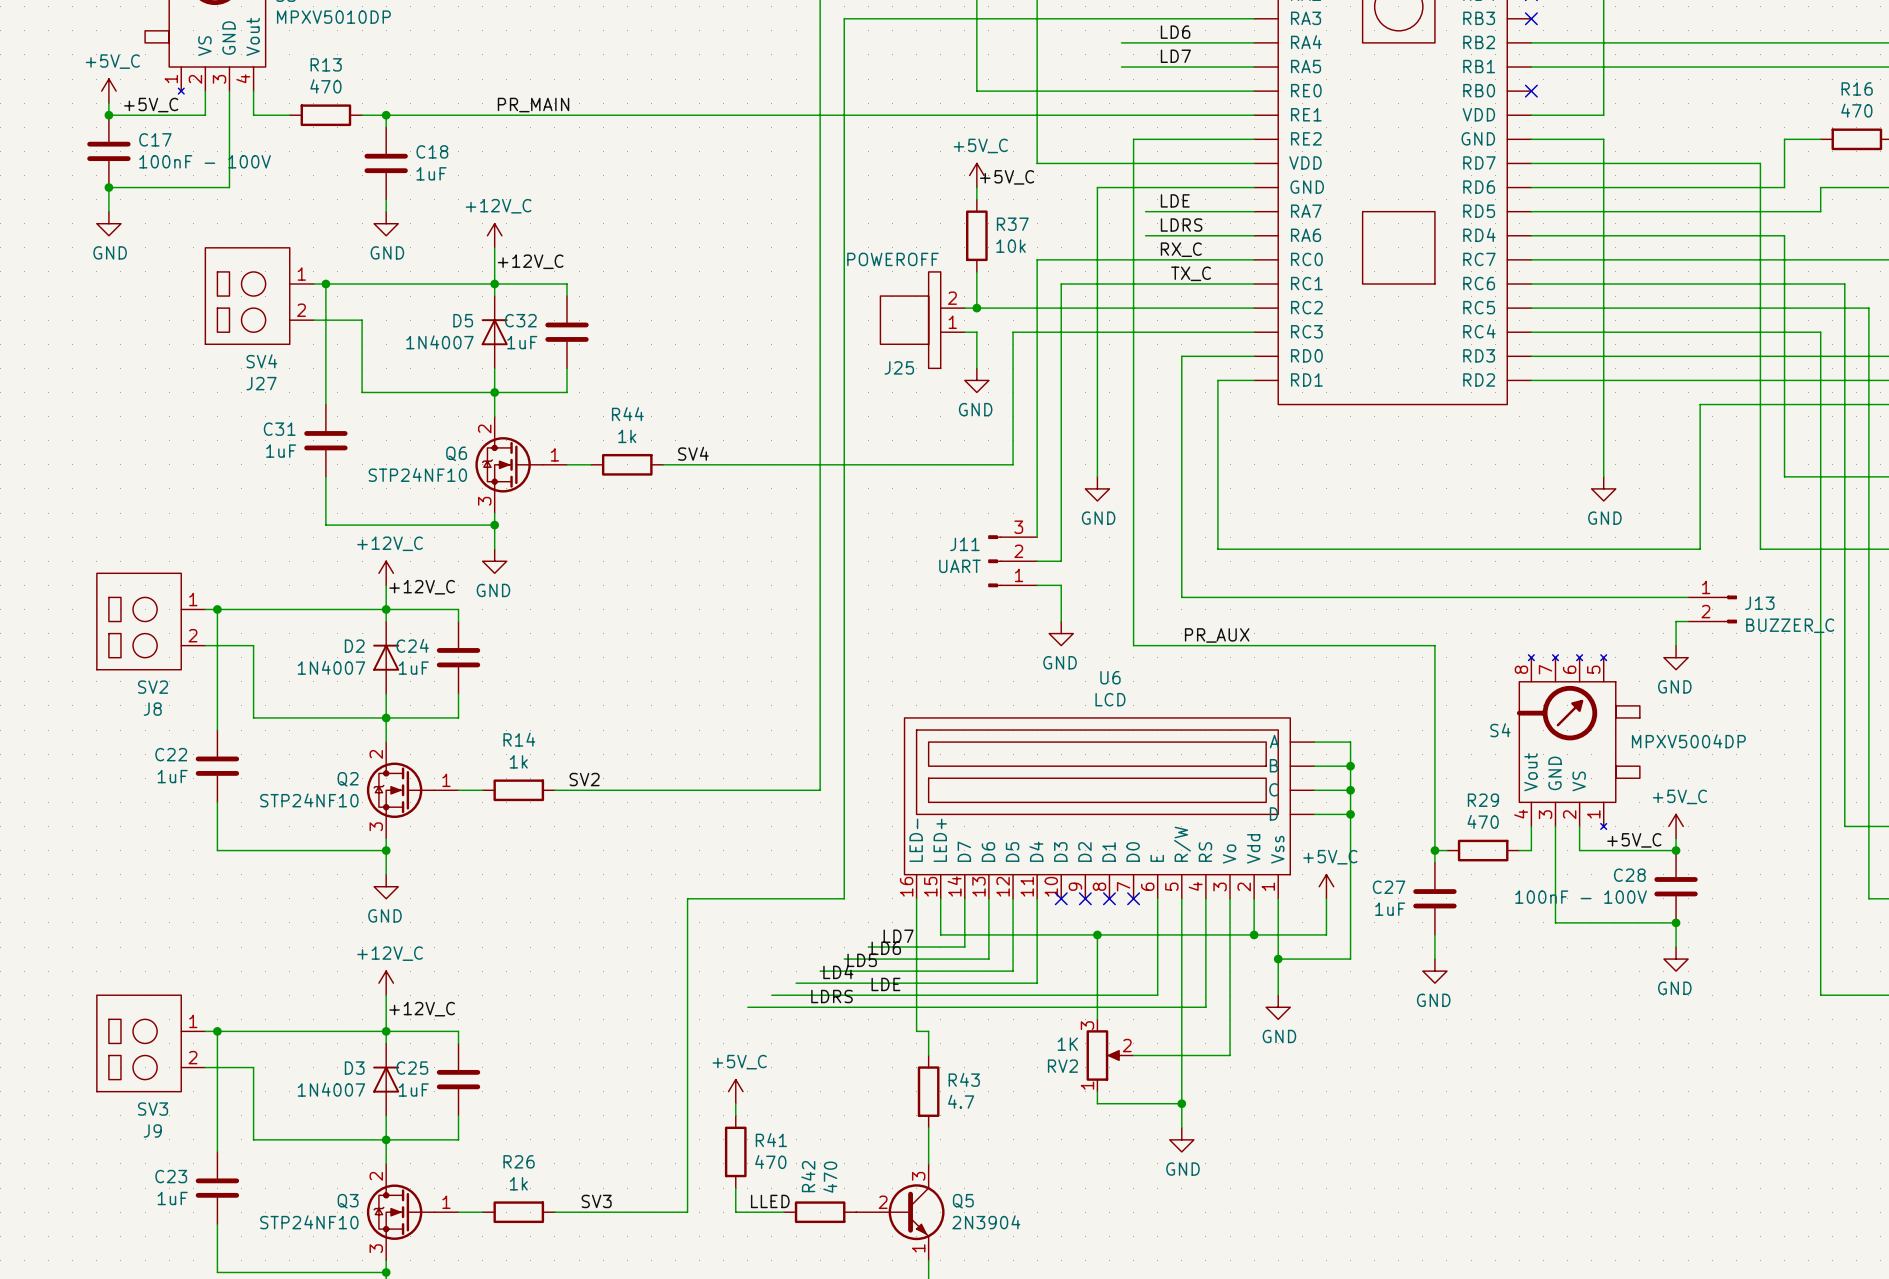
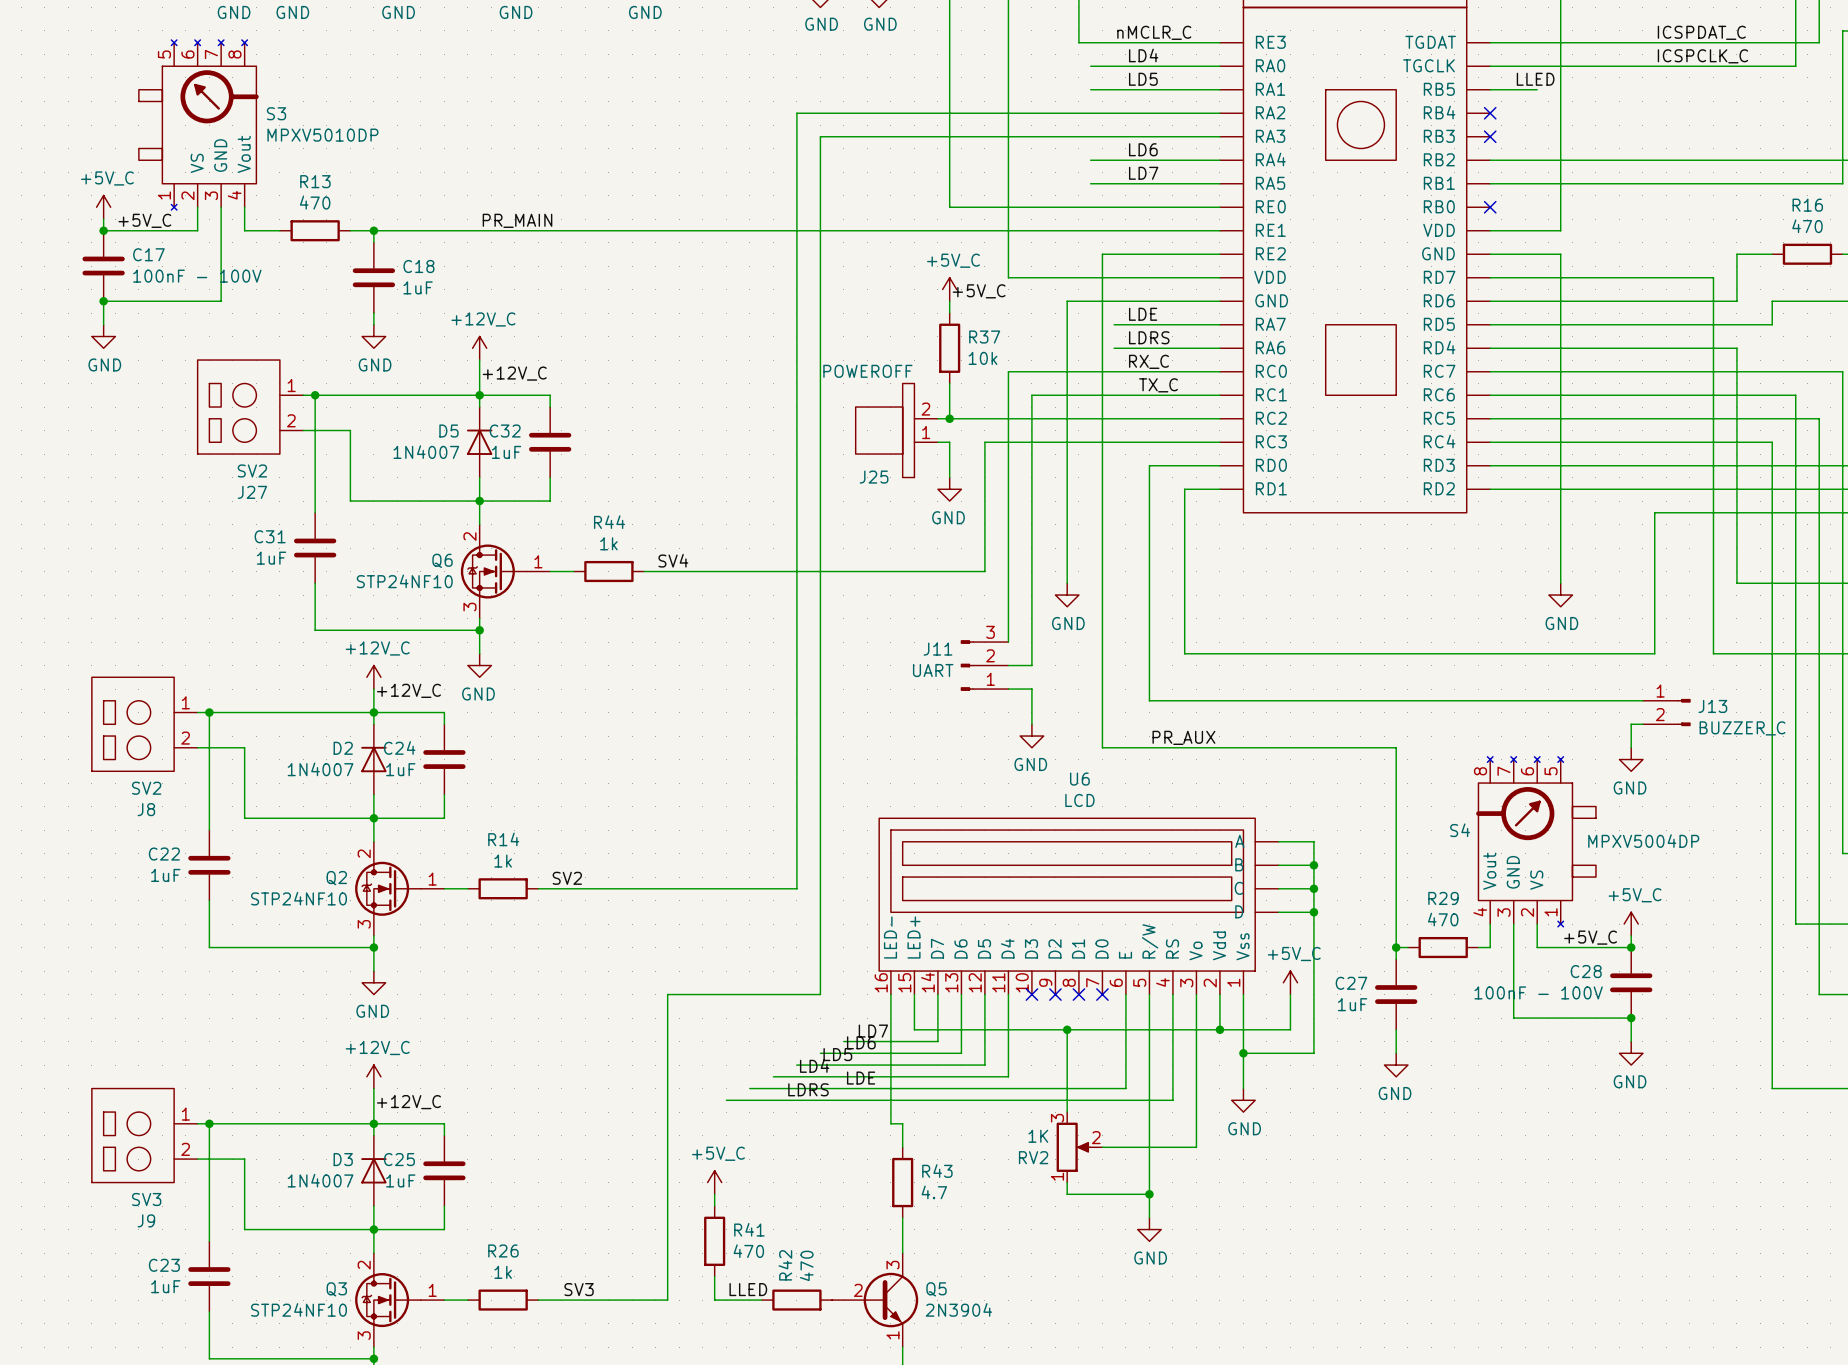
J27 value: SV4 (261, 361) -> SV2 (252, 470)

